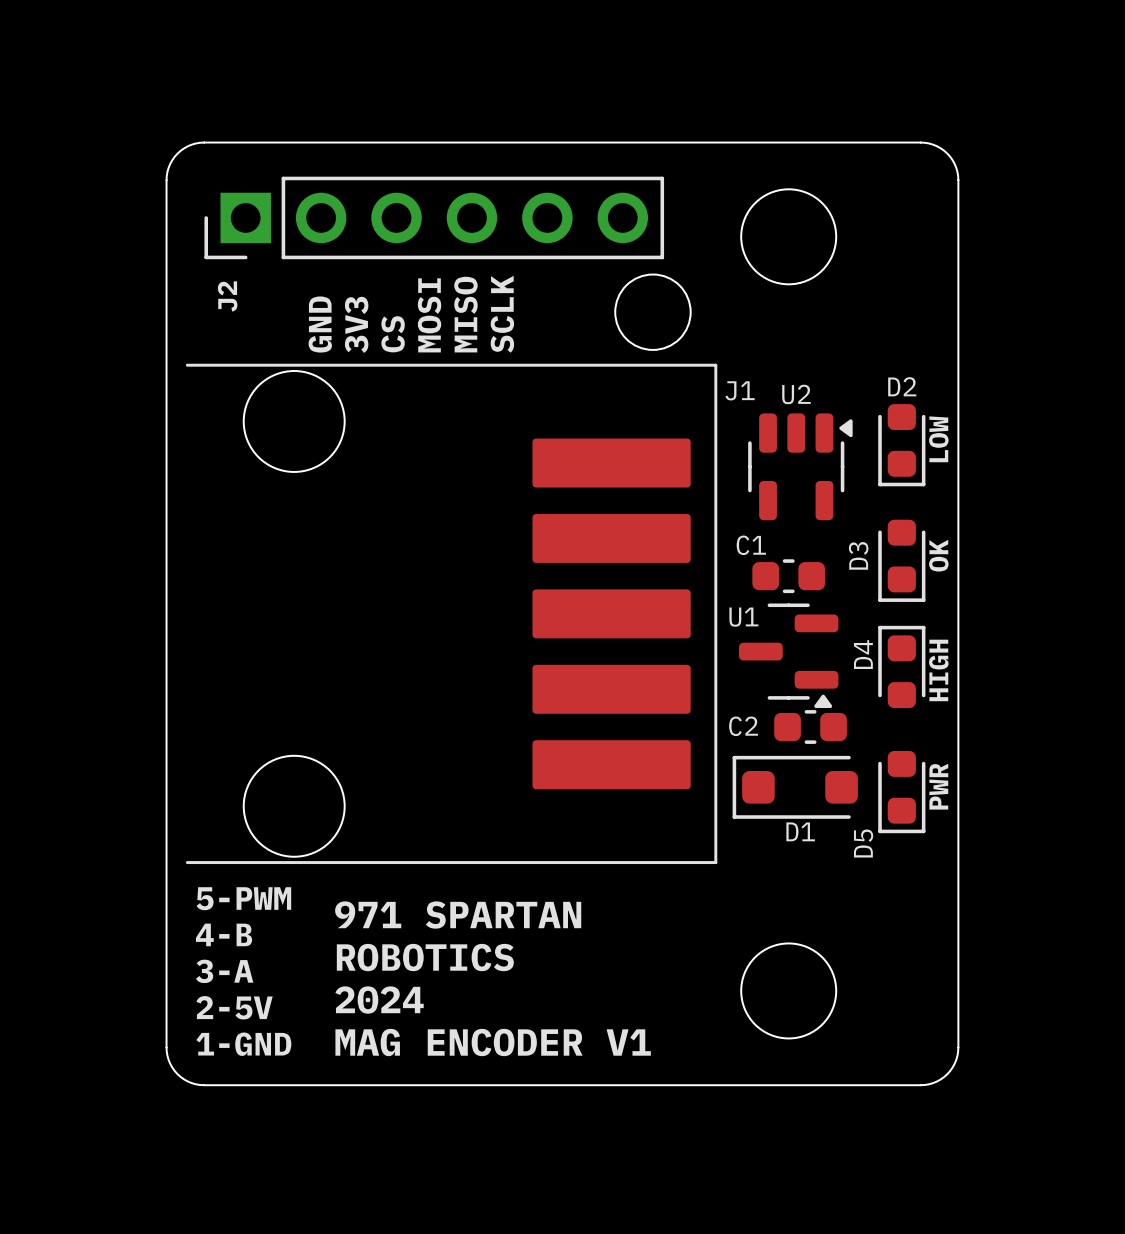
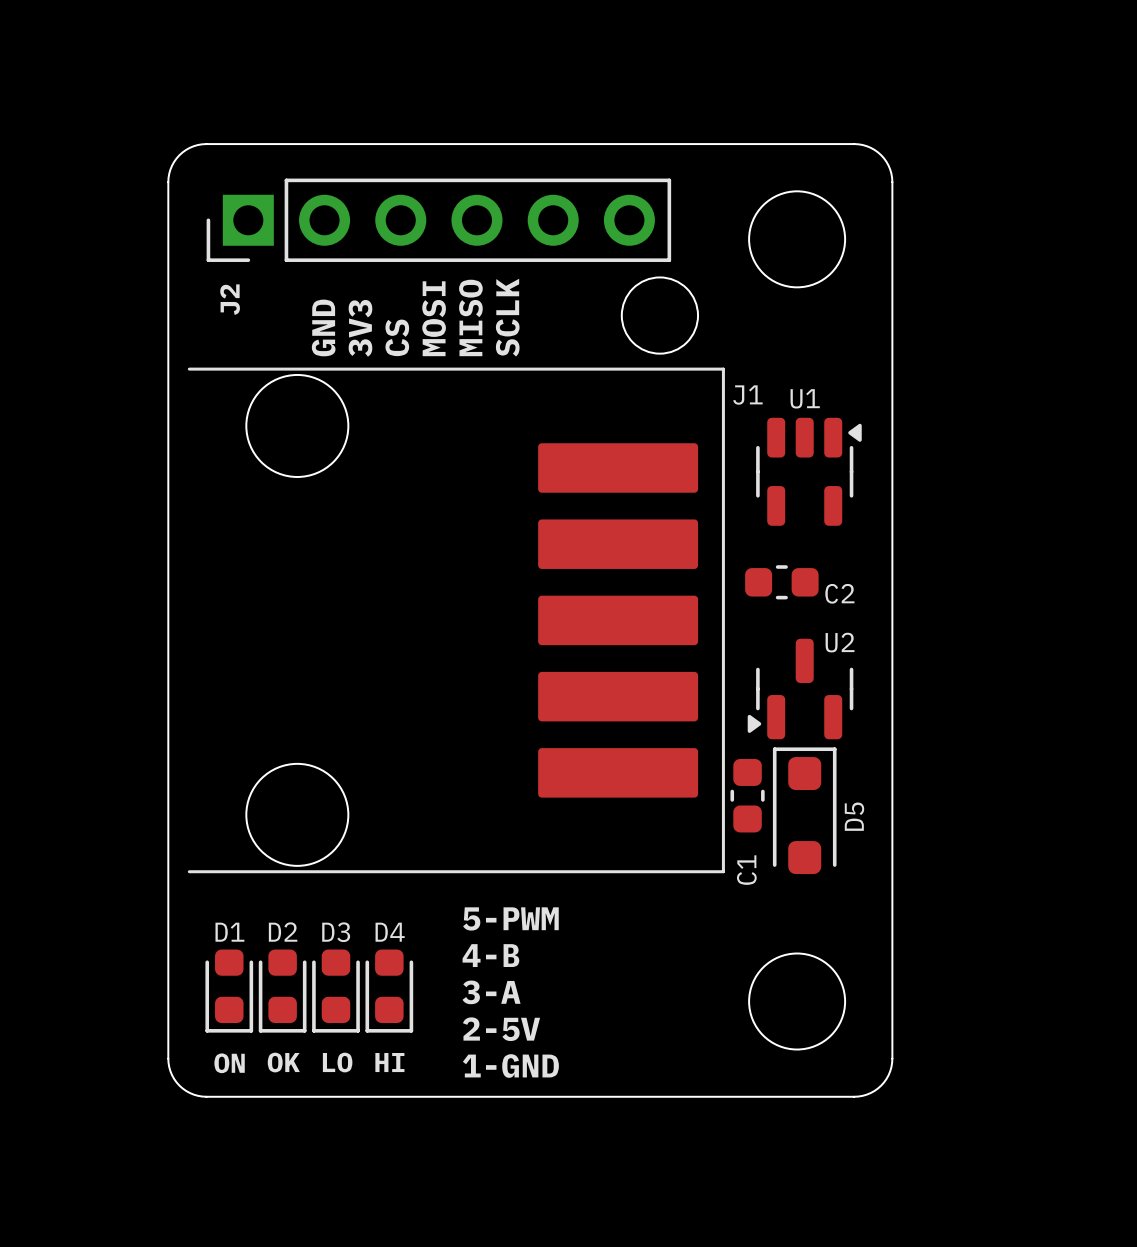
board edge: (845, 142) (920, 142) (933, 144) (944, 150) (952, 160) (958, 180) (958, 1051) (950, 1071) (933, 1083) (920, 1085) (845, 1085) -> (854, 144) (870, 147) (881, 155) (888, 165) (892, 182) (892, 1058) (890, 1071) (881, 1085) (866, 1094) (854, 1096)
U2 name: U2 (796, 394) -> U1 (805, 398)
D2 value: LOW (938, 439) -> OK (283, 1062)
D2 position: (901, 445) -> (282, 991)
C1 name position: C1 (751, 545) -> C1 (746, 870)
D3 name rotation: 0° (858, 555) -> 90° clockwise (336, 932)
D3 name position: D3 (858, 555) -> D3 (336, 932)
D3 value: OK (938, 555) -> LO (337, 1062)
D3 position: (901, 560) -> (335, 991)
C1 rotation: 0° (788, 576) -> 90° clockwise (747, 795)
C1 position: (788, 576) -> (747, 795)
U1: (788, 655) -> none
D4 rotation: 0° (901, 666) -> 180° (389, 991)
D4 position: (901, 666) -> (389, 991)
D4 value: HIGH (938, 670) -> HI (389, 1062)
U2: none -> (800, 689)
C2 name position: C2 (743, 726) -> C2 (839, 593)
C2 position: (810, 727) -> (781, 582)
D5 footprint: [878, 750, 926, 834] -> [772, 747, 837, 875]
D1 footprint: [732, 755, 858, 819] -> [205, 949, 254, 1033]
D5 value: PWR (938, 786) -> none
D1 name position: D1 (800, 831) -> D1 (229, 932)
D5 name position: D5 (863, 843) -> D5 (854, 816)
text position: 5-PWM (243, 898) -> 5-PWM (510, 918)
text: 971 SPARTAN (458, 915) -> none
text position: 4-B (224, 934) -> 4-B (490, 955)
text: ROBOTICS (425, 957) -> none
text position: 3-A (224, 971) -> 3-A (491, 992)
text: 2024 (379, 1000) -> none
text position: 2-5V (234, 1007) -> 2-5V (501, 1029)
text: MAG ENCODER V1 (493, 1042) -> none
text position: 1-GND (243, 1044) -> 1-GND (510, 1066)
D1 value: none -> ON (229, 1063)

